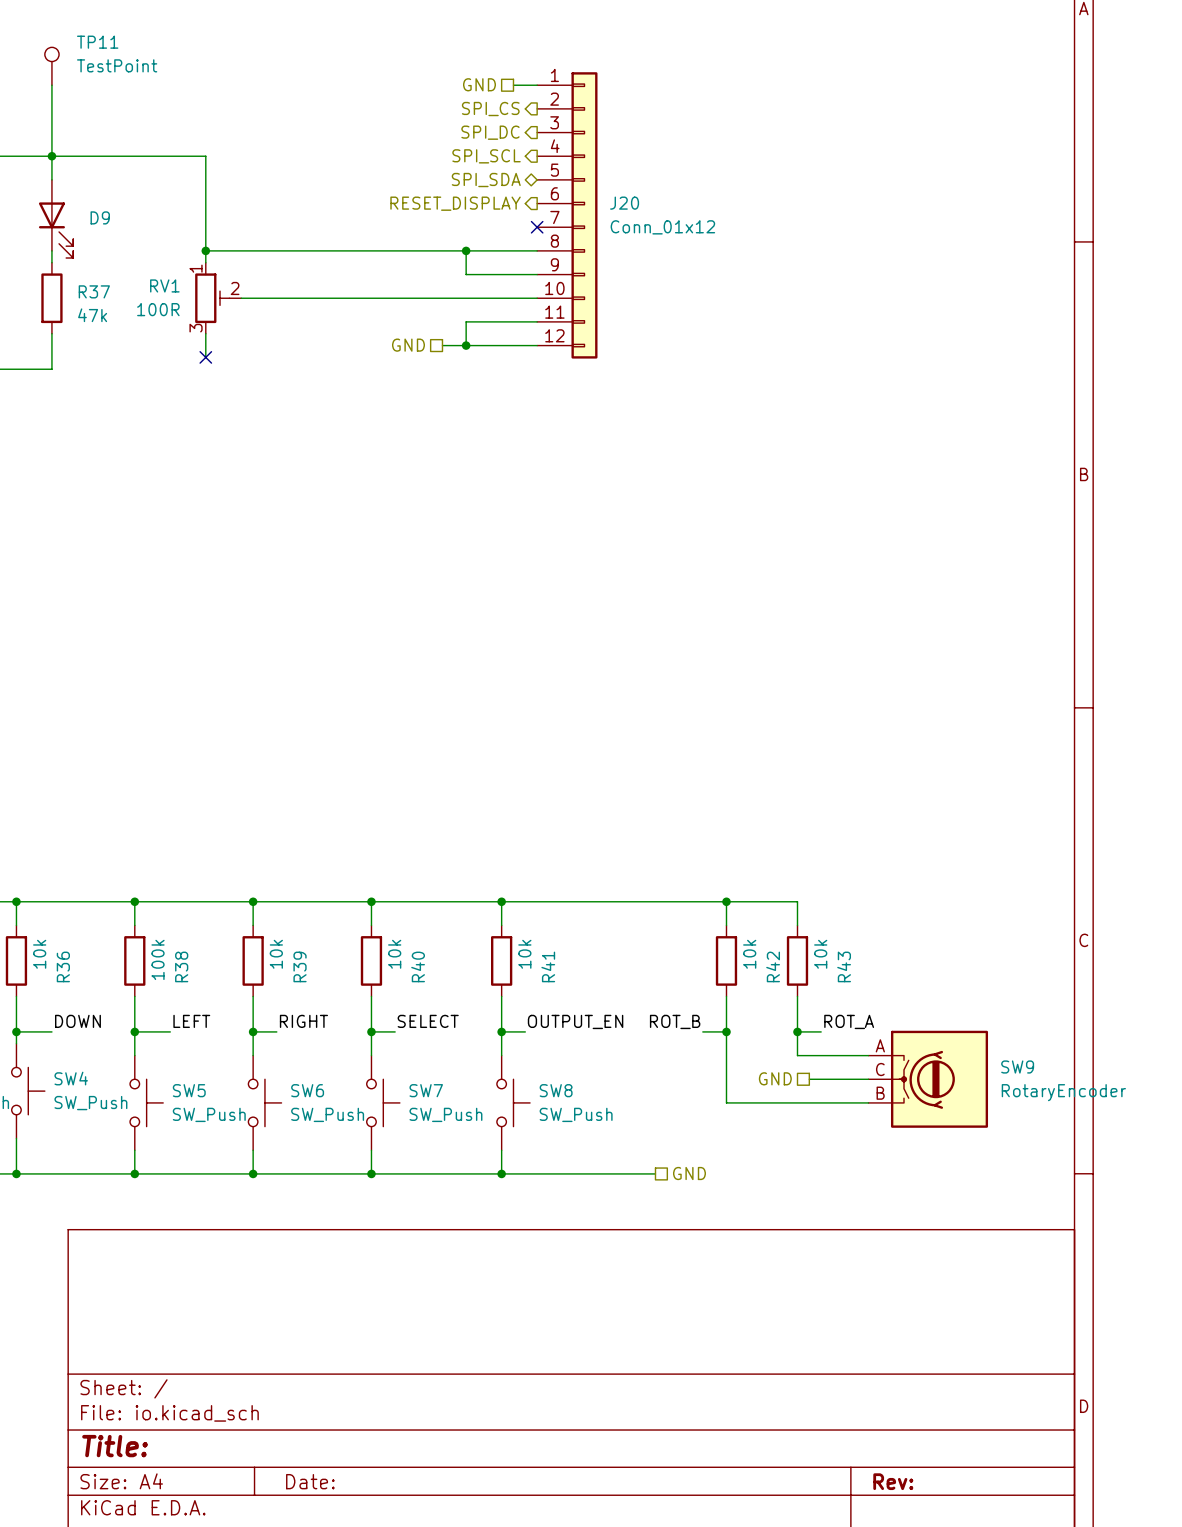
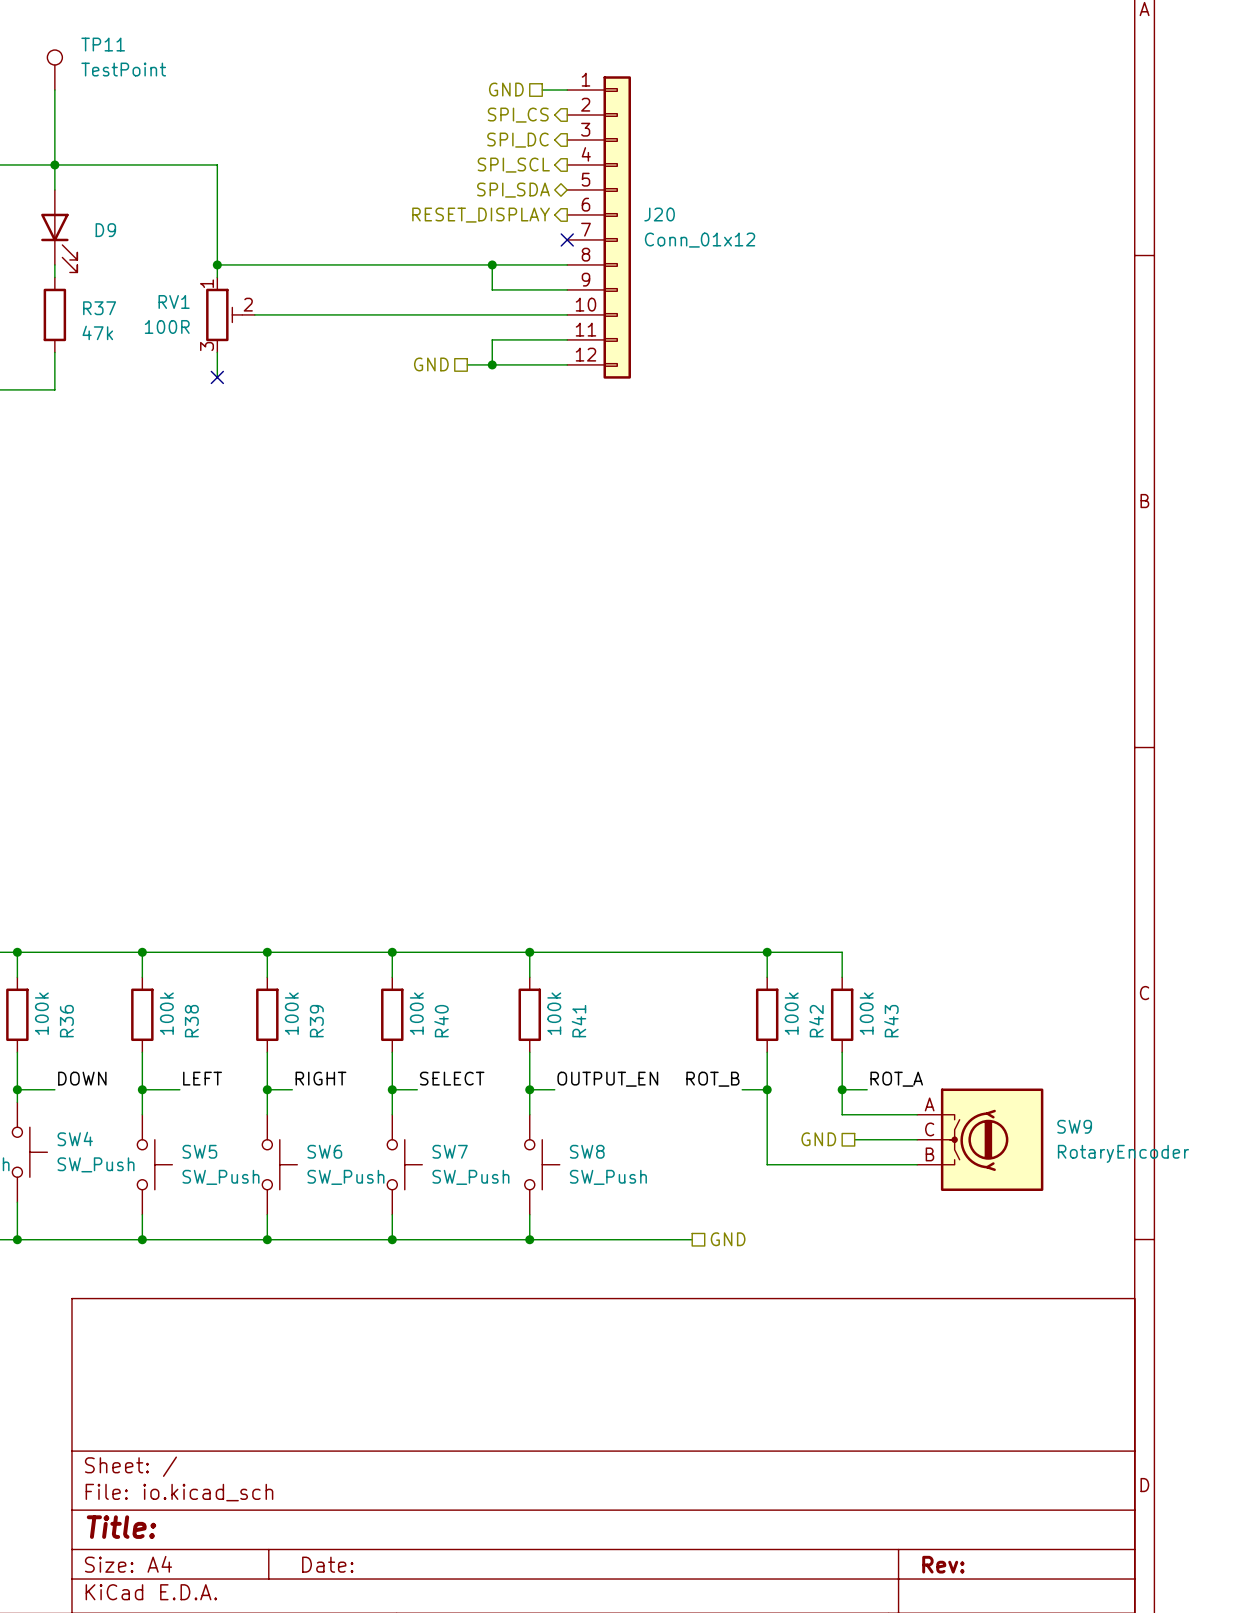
R36 value: 10k (39, 954) -> 100k (41, 1013)
R39 value: 10k (276, 954) -> 100k (291, 1013)
R40 value: 10k (394, 954) -> 100k (416, 1013)
R41 value: 10k (524, 954) -> 100k (554, 1013)
R42 value: 10k (749, 954) -> 100k (791, 1013)
R43 value: 10k (820, 954) -> 100k (866, 1013)

